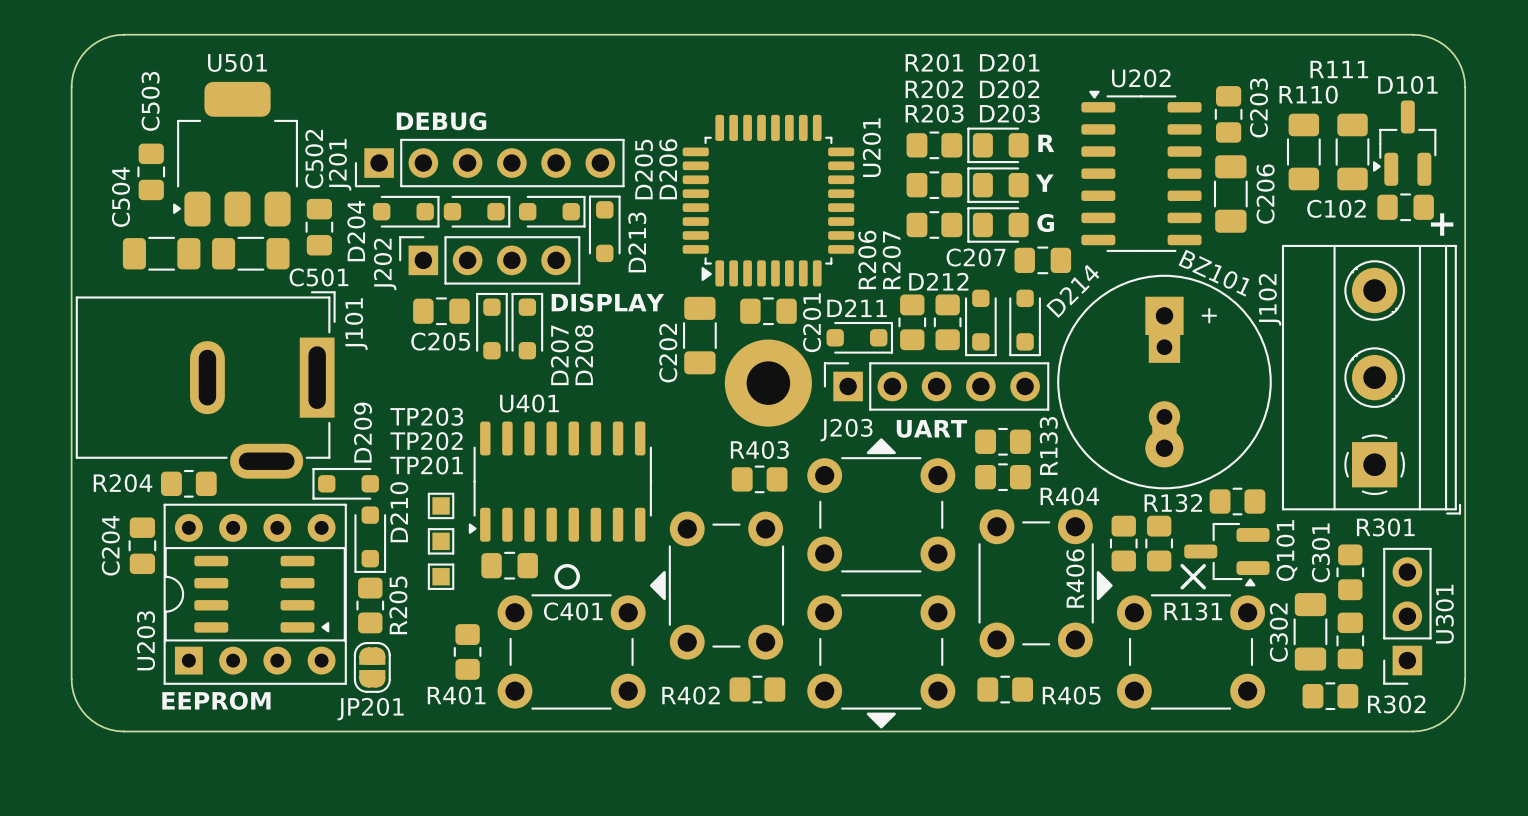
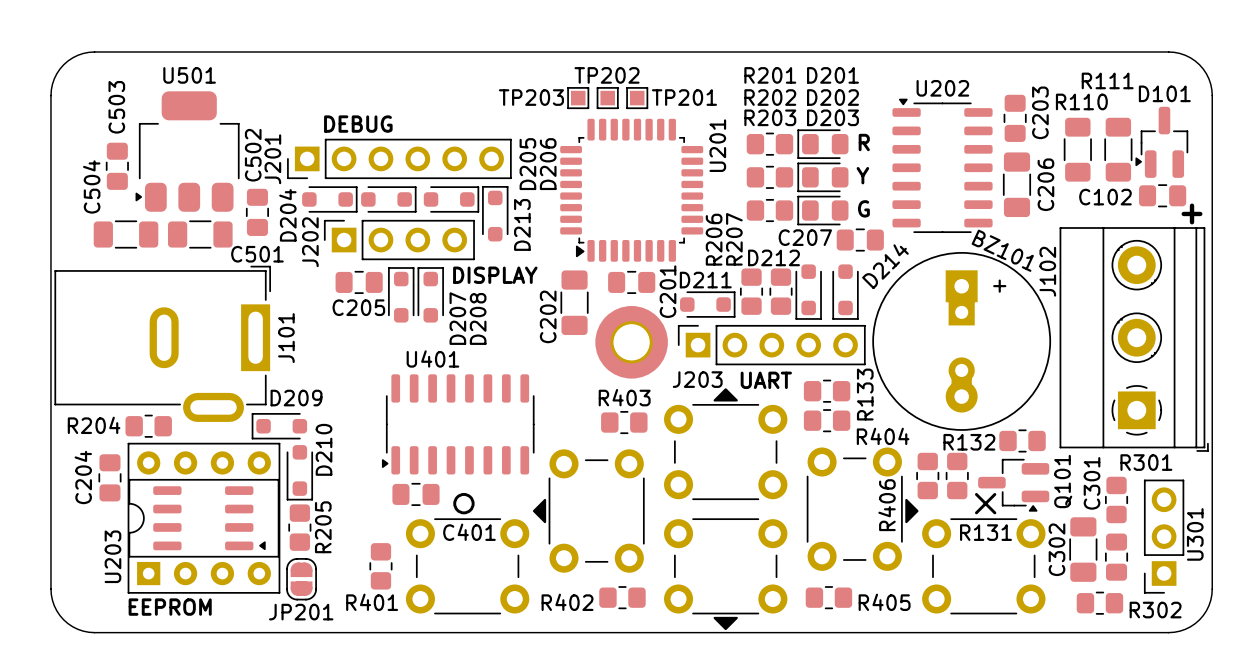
J101 name position: J101 (356, 324) -> J101 (286, 338)
TP203 name position: TP203 (426, 416) -> TP203 (531, 97)
D209 name rotation: 0° (362, 432) -> 90° clockwise (296, 398)
TP202 name position: TP202 (426, 441) -> TP202 (607, 75)
TP201 name position: TP201 (426, 465) -> TP201 (684, 97)
TP203 position: (441, 505) -> (578, 98)
TP202 position: (441, 541) -> (607, 98)
TP201 position: (441, 576) -> (637, 98)

